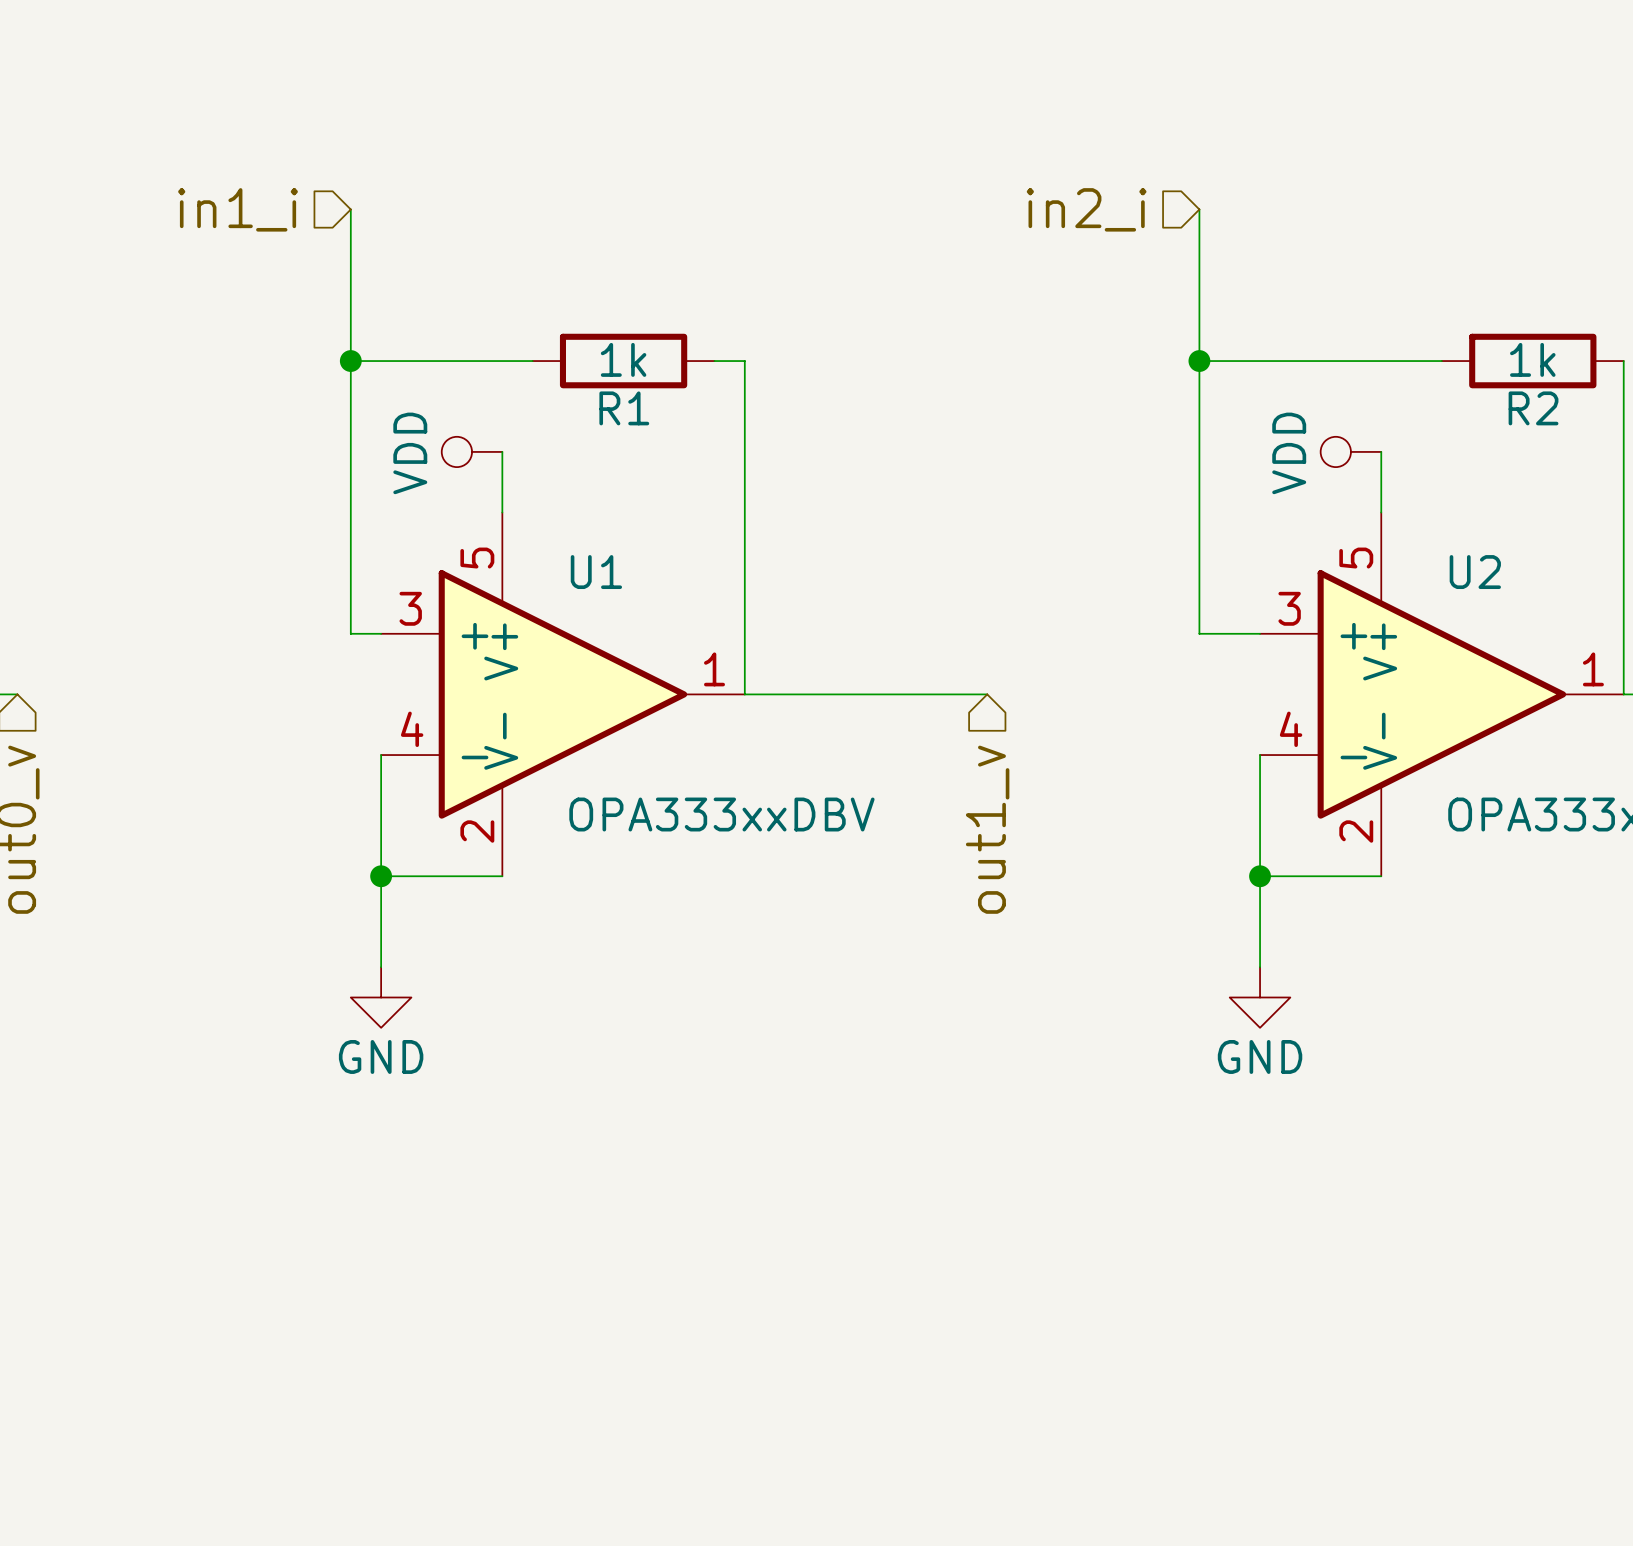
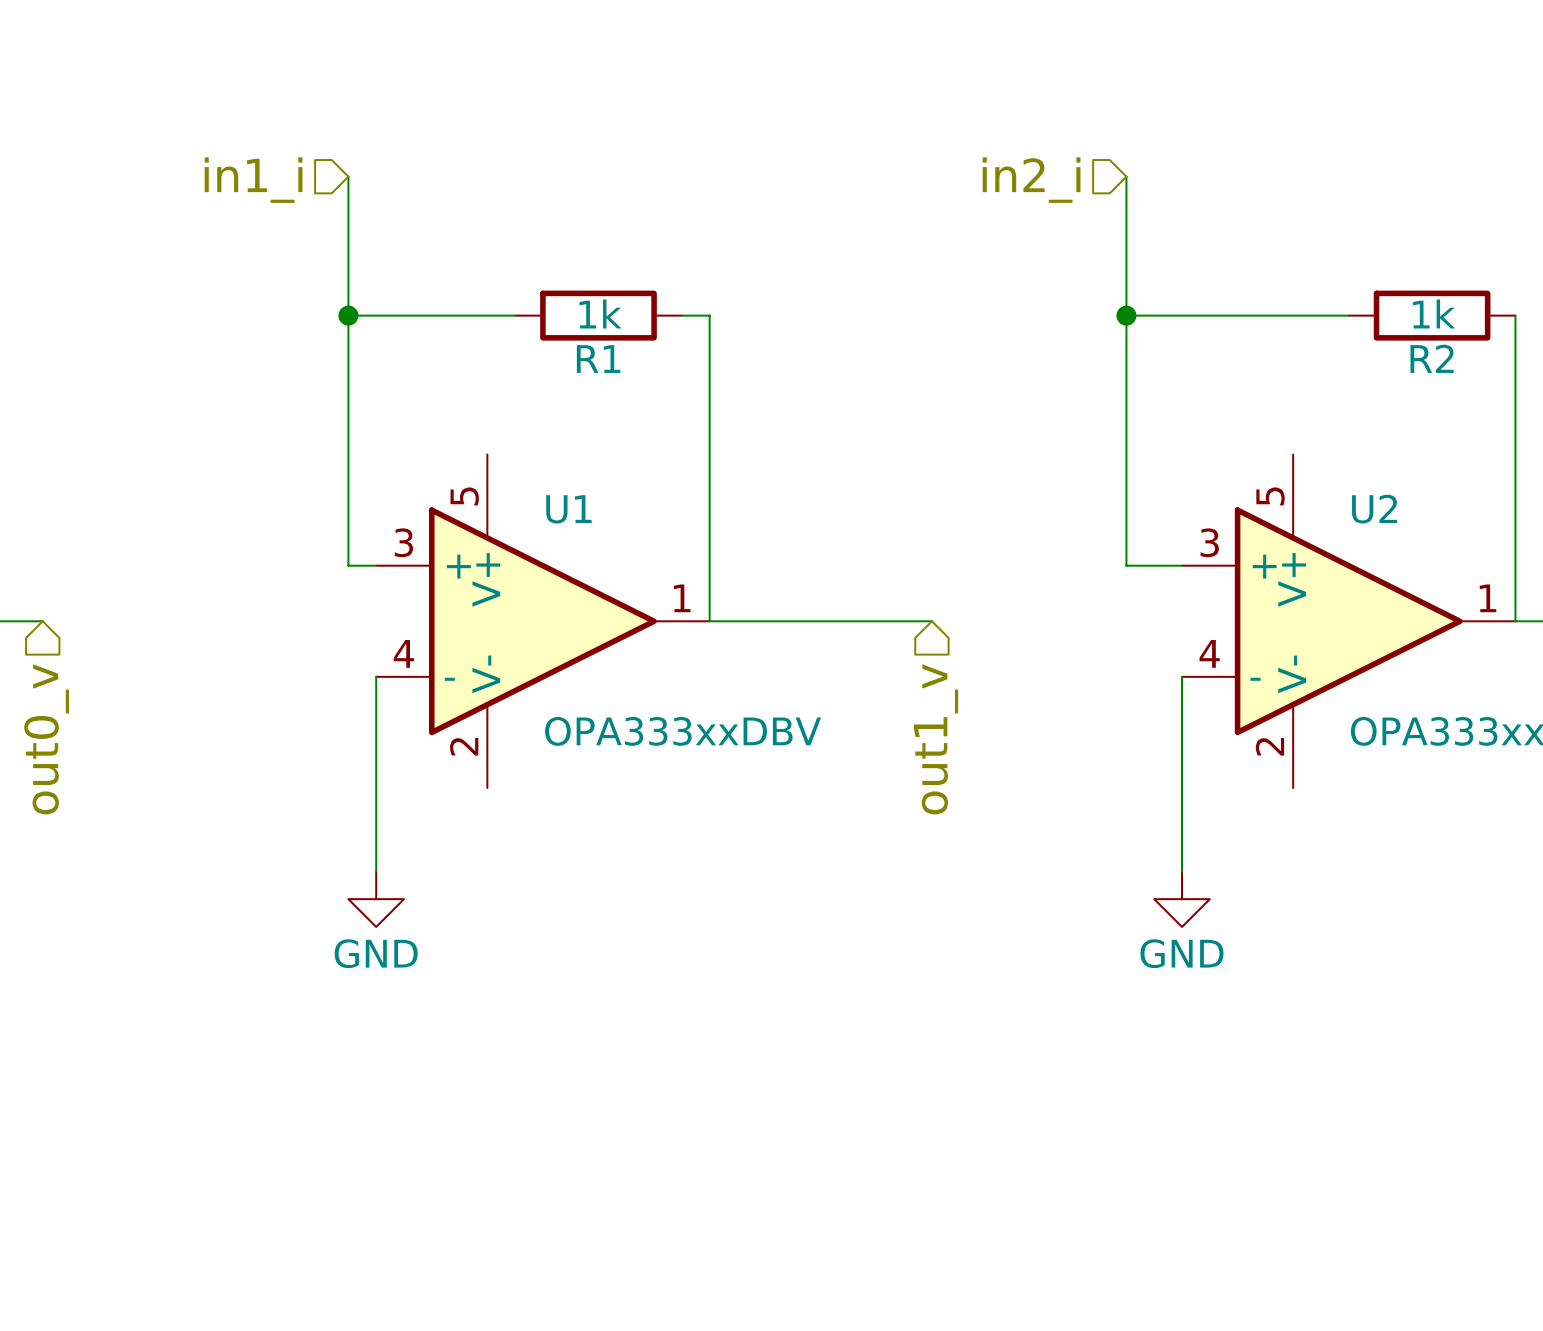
power symbol: VDD (472, 451) -> none
wire: (502, 451) (502, 512) -> none
power symbol: VDD (1350, 451) -> none
wire: (1381, 451) (1381, 512) -> none
wire: (381, 876) (502, 876) -> none
junction: (381, 876) -> none
wire: (1260, 876) (1381, 876) -> none
junction: (1260, 876) -> none

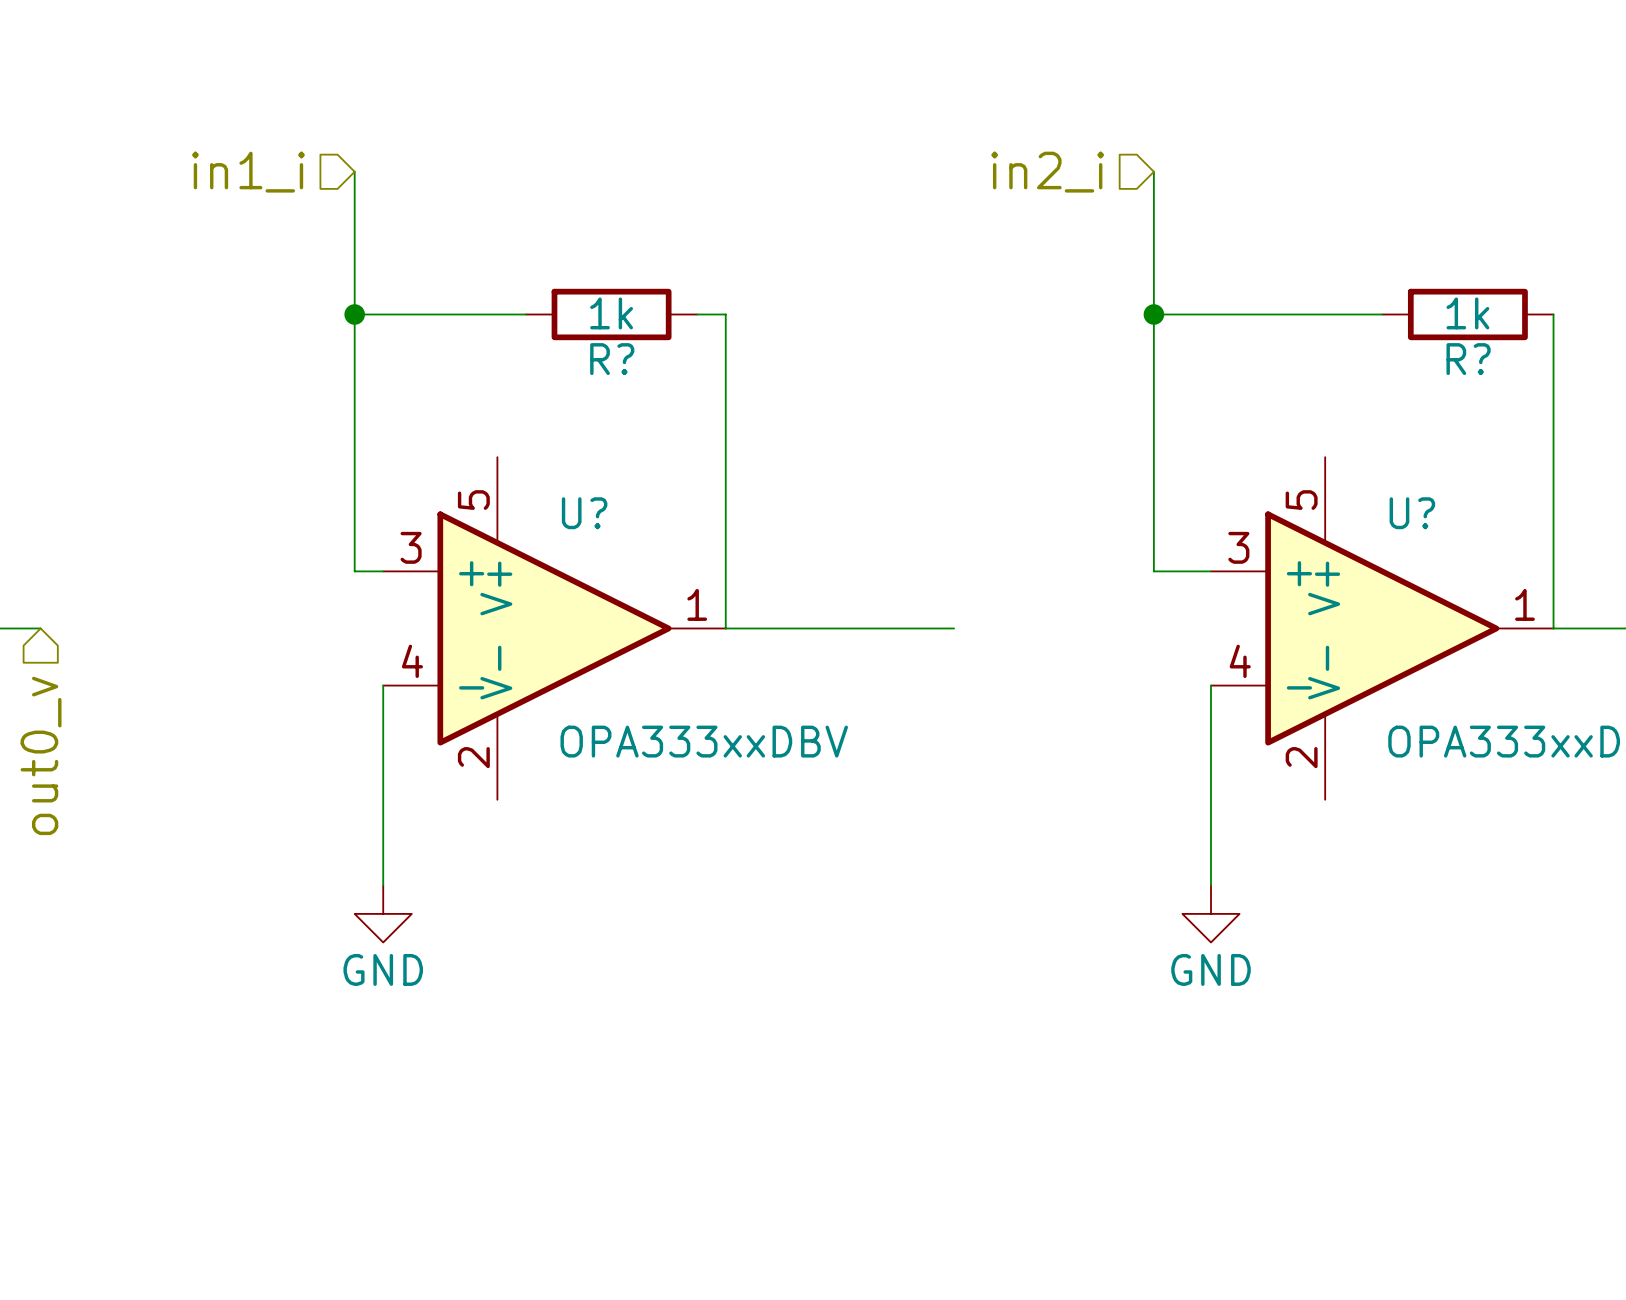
R2 name: R2 (1432, 358) -> R? (1468, 359)
R1 name: R1 (598, 359) -> R? (612, 359)
U1 name: U1 (568, 509) -> U? (584, 513)
U2 name: U2 (1374, 509) -> U? (1412, 513)
hierarchical label: out1_v (936, 739) -> none

